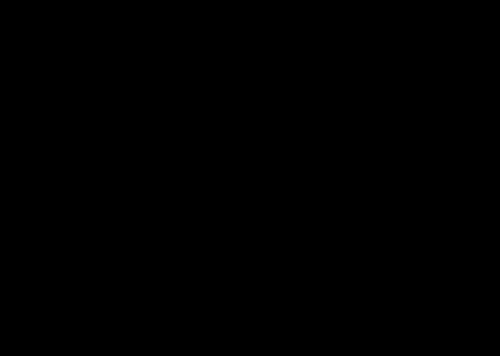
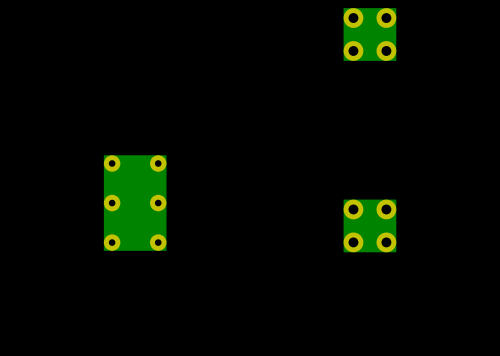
part: none -> (369, 34)
part: none -> (135, 203)
part: none -> (369, 225)

